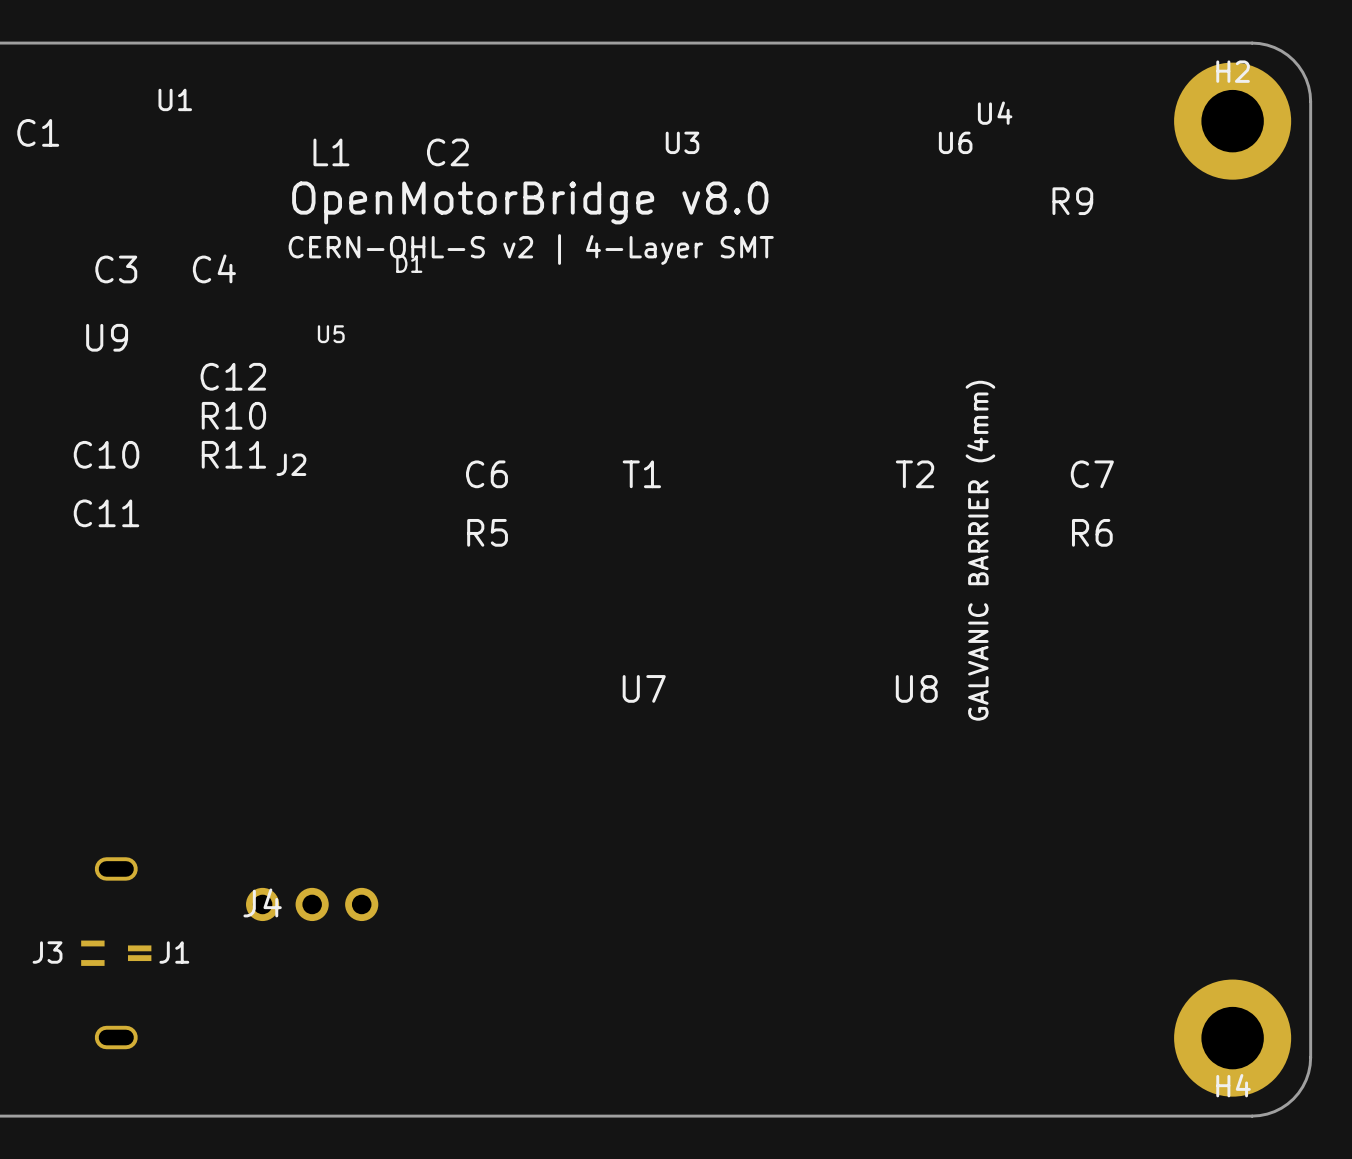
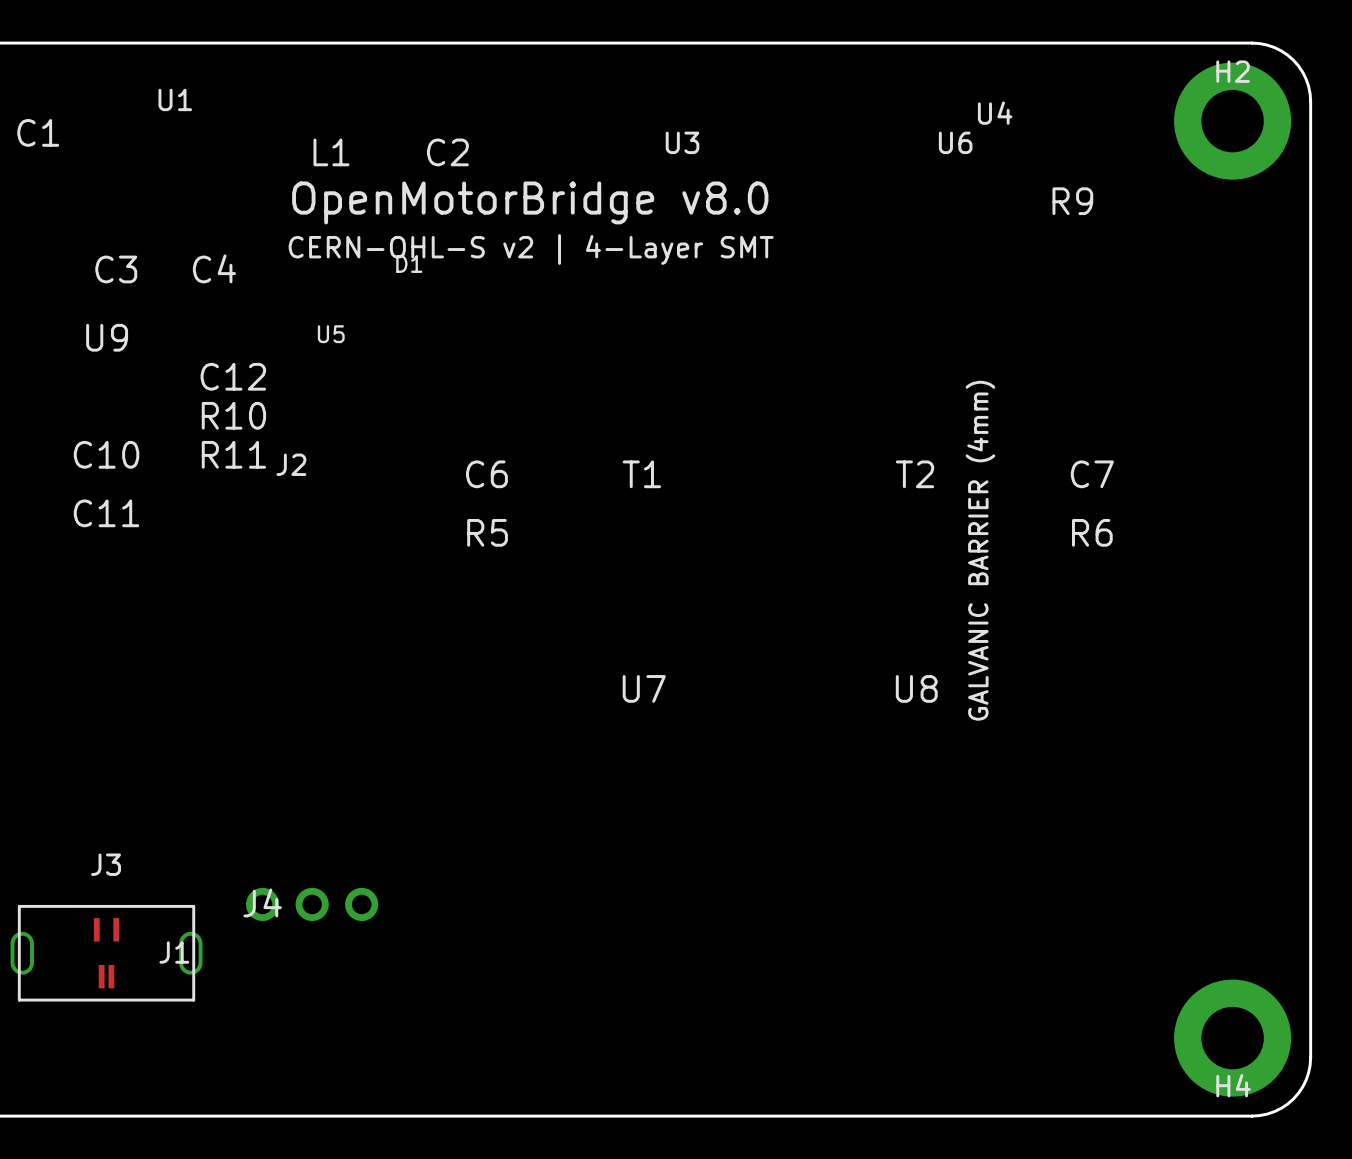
J3 footprint: [81, 857, 152, 1050] -> [10, 904, 203, 1002]
J3 name position: J3 (47, 952) -> J3 (106, 864)

